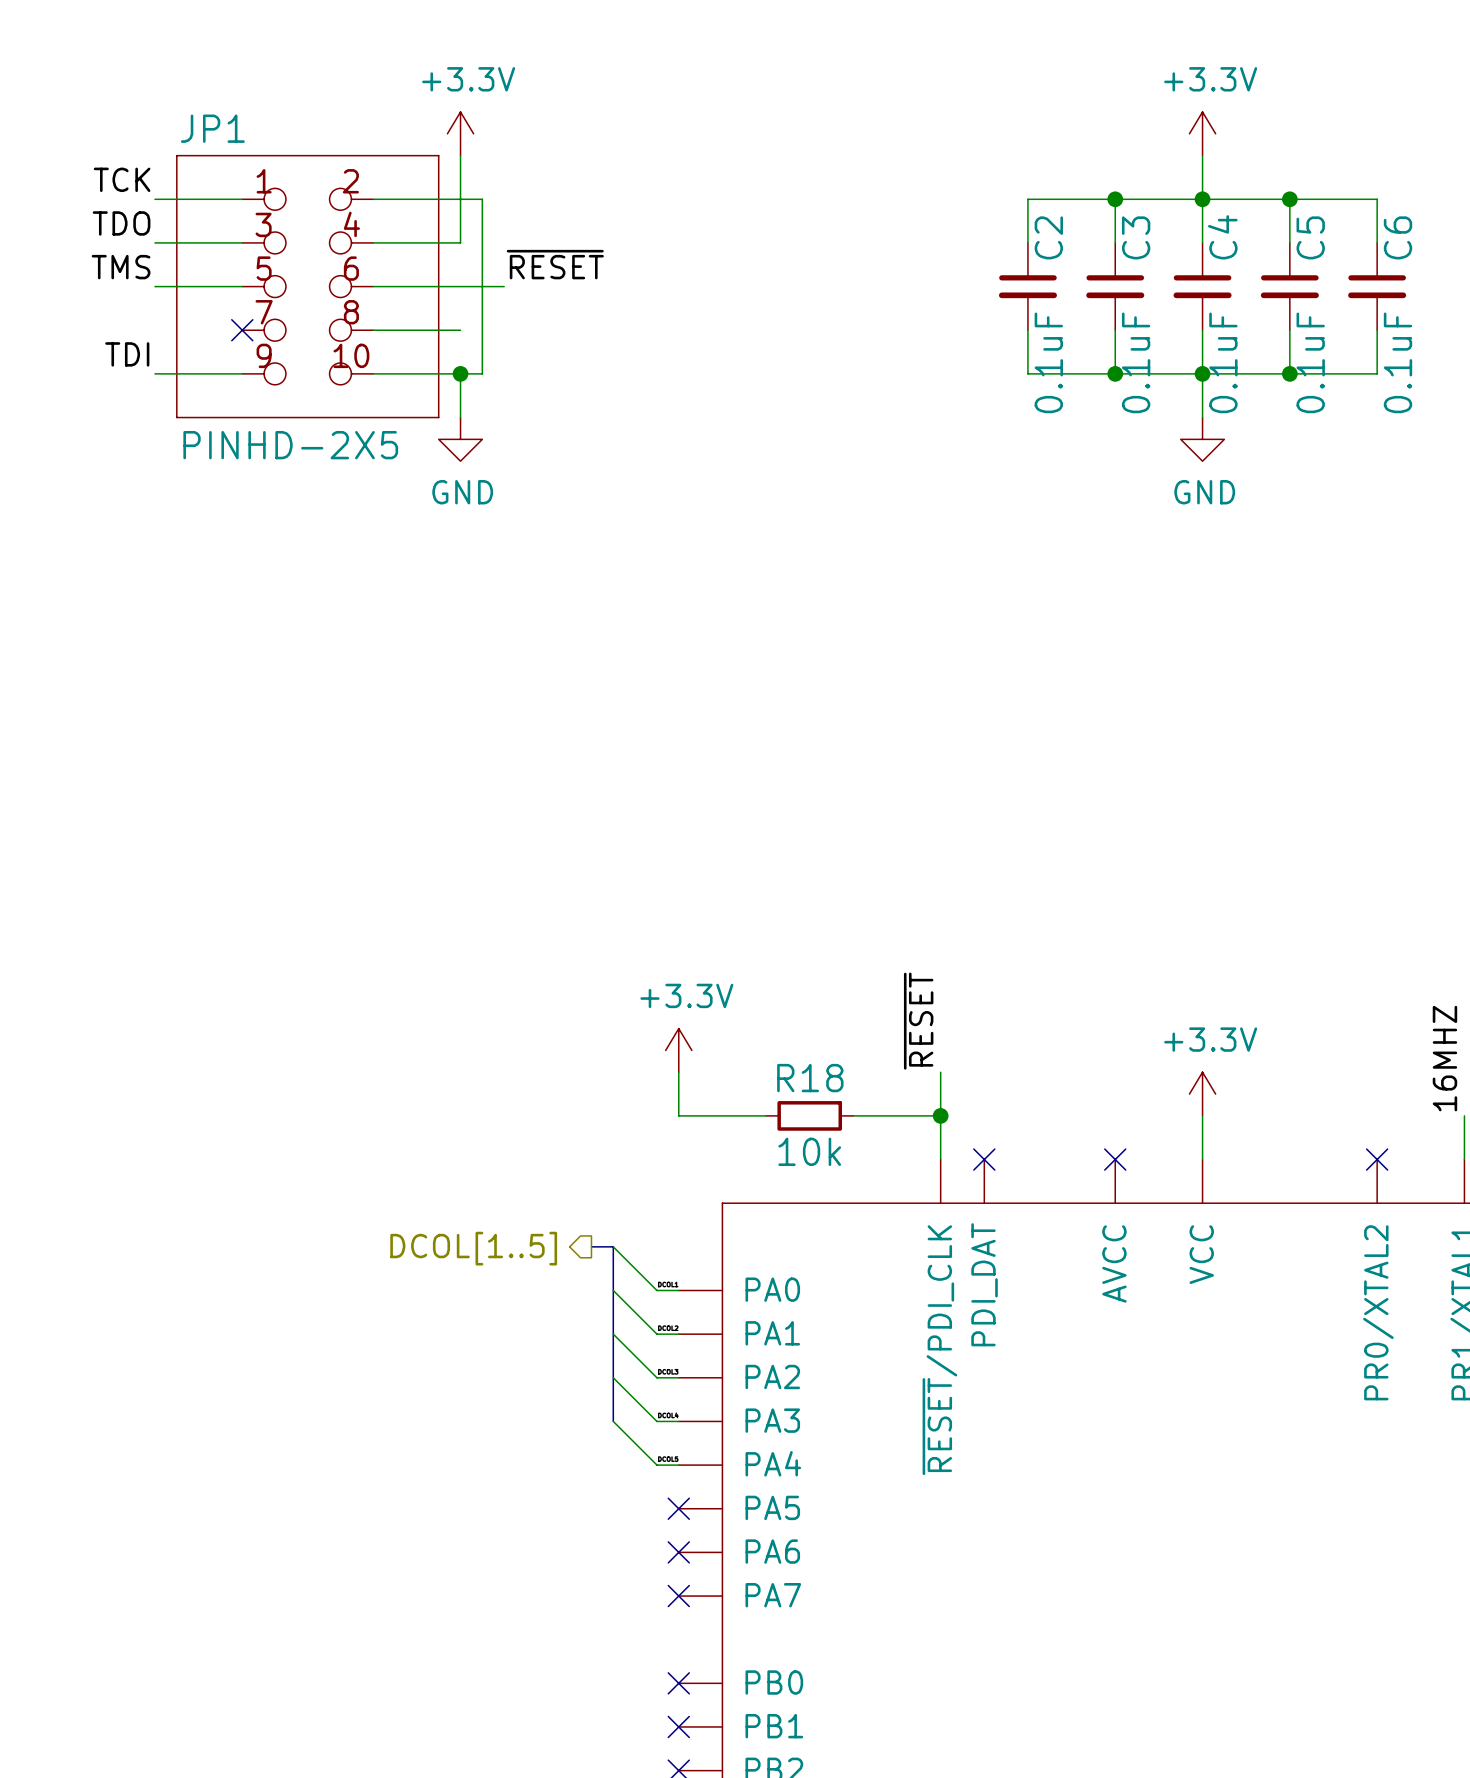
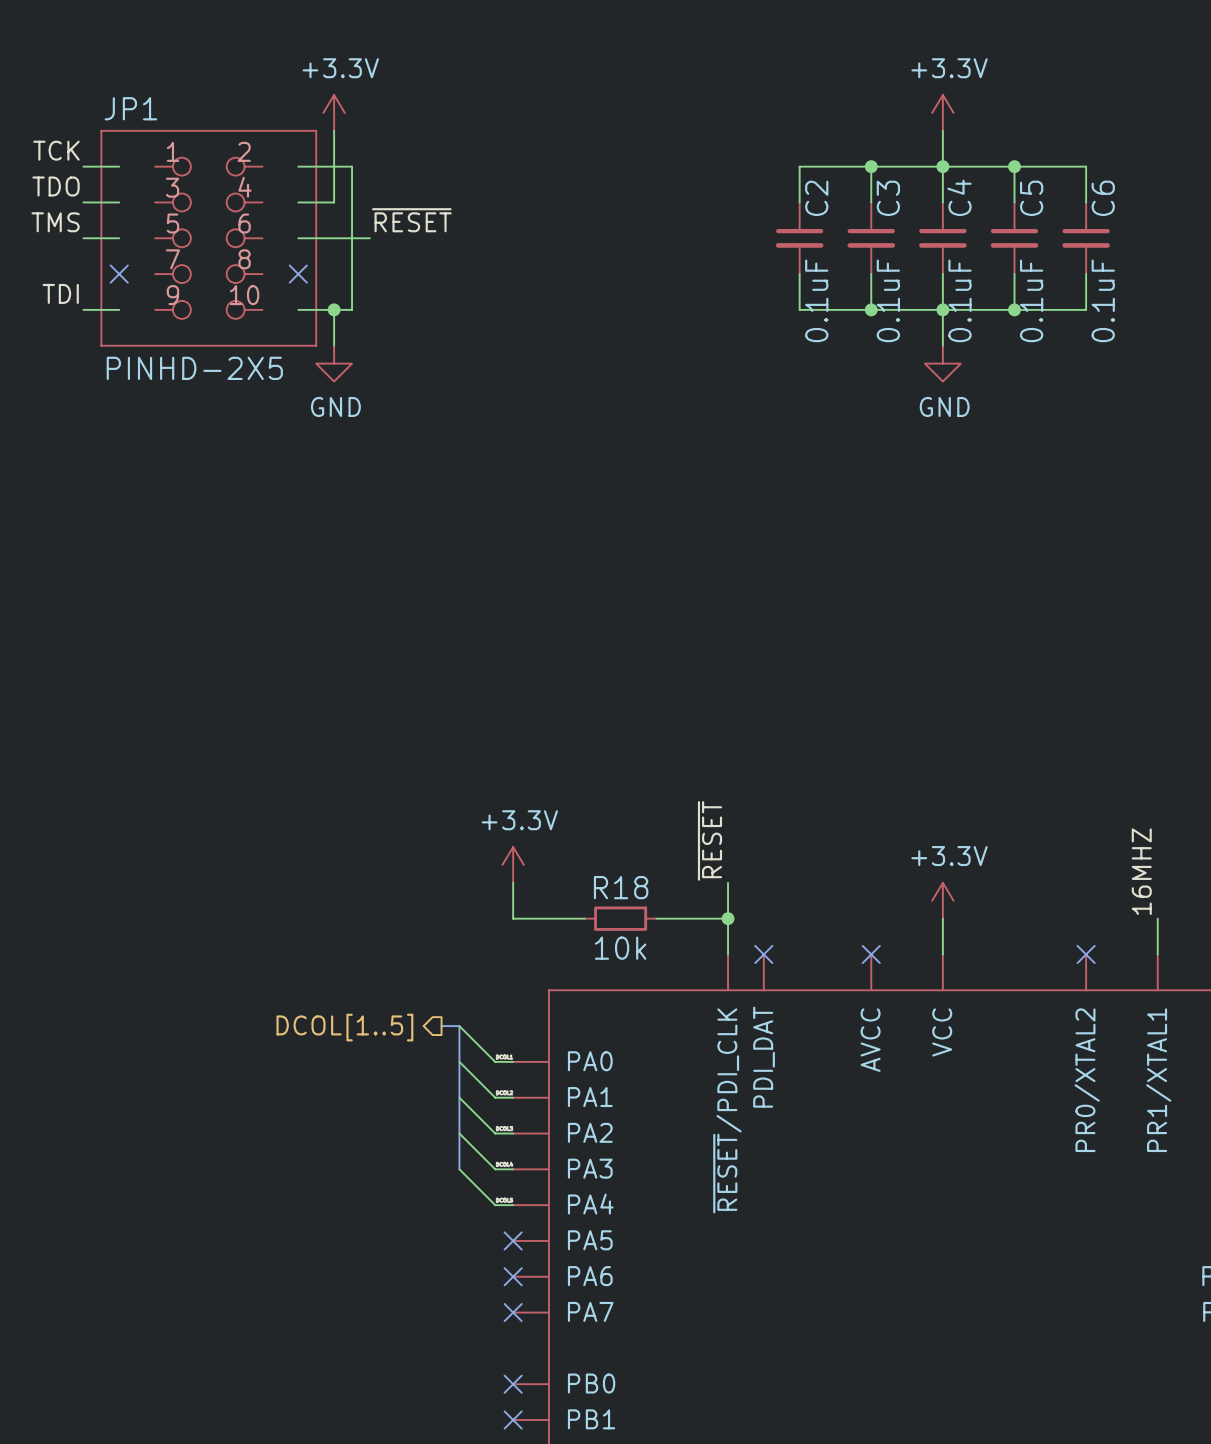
wire: (198, 199) (242, 199) -> none
wire: (373, 199) (416, 199) -> none
wire: (198, 242) (242, 242) -> none
wire: (373, 242) (416, 242) -> none
wire: (198, 286) (242, 286) -> none
wire: (373, 286) (416, 286) -> none
no-connect mark position: (242, 330) -> (119, 274)
wire: (373, 330) (460, 330) -> none
no-connect mark: none -> (298, 274)
wire: (198, 373) (242, 373) -> none
wire: (373, 373) (416, 373) -> none

